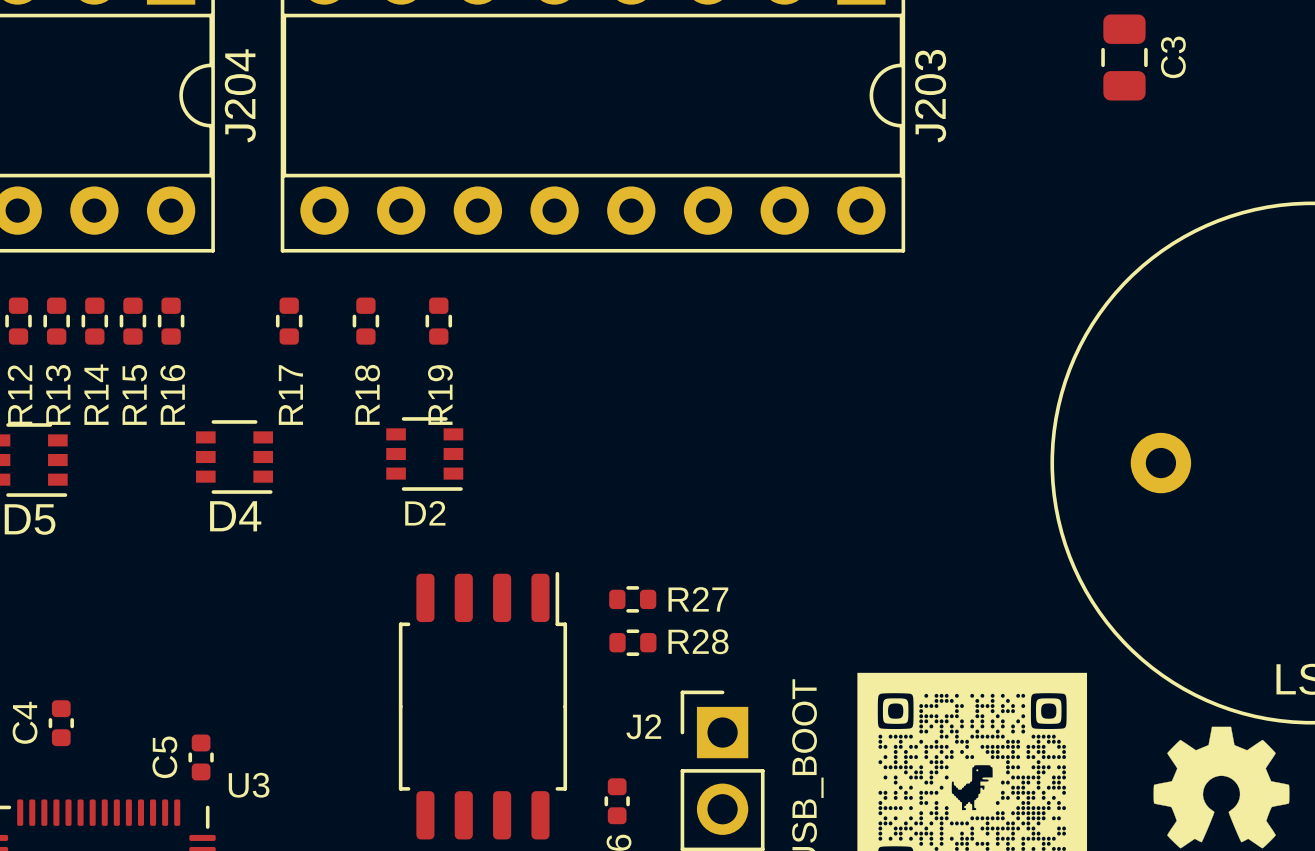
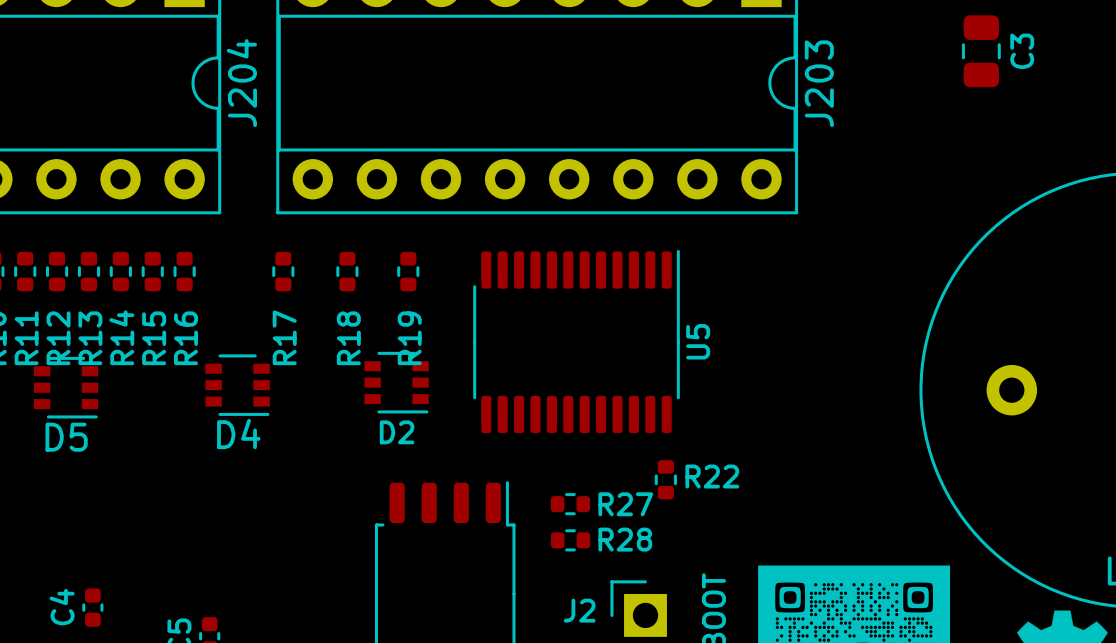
U5: none -> (576, 341)
R22: none -> (665, 479)

